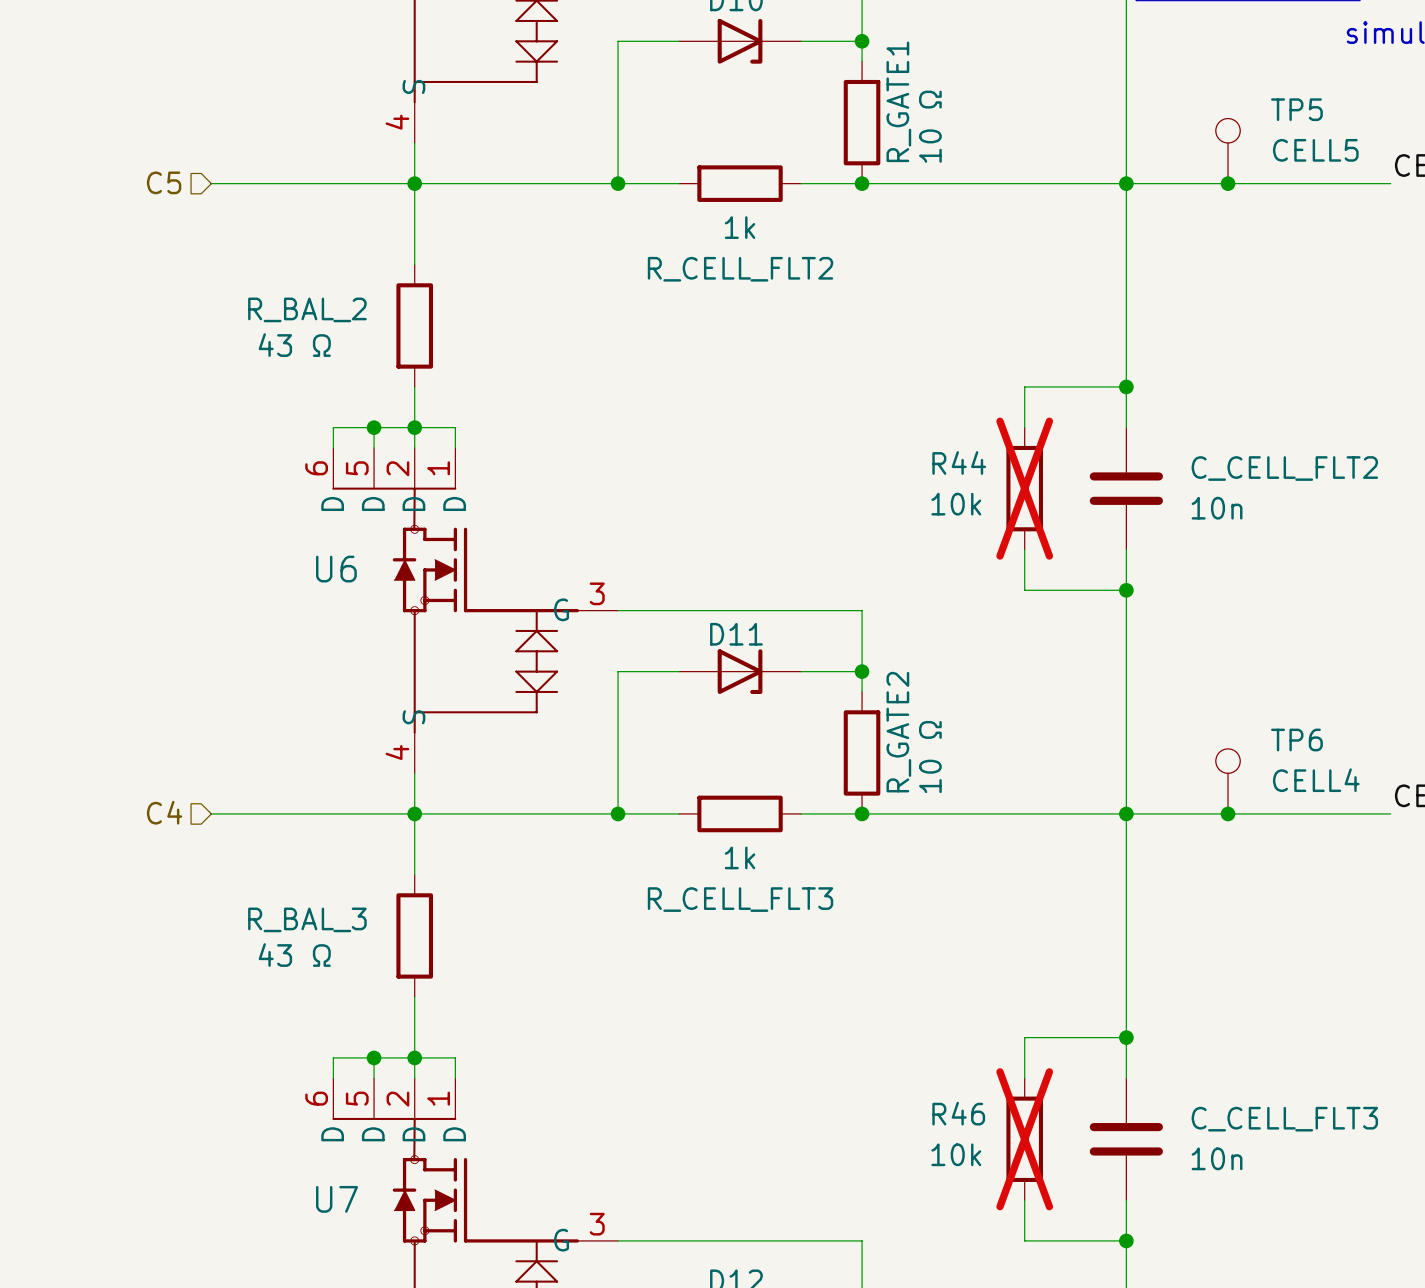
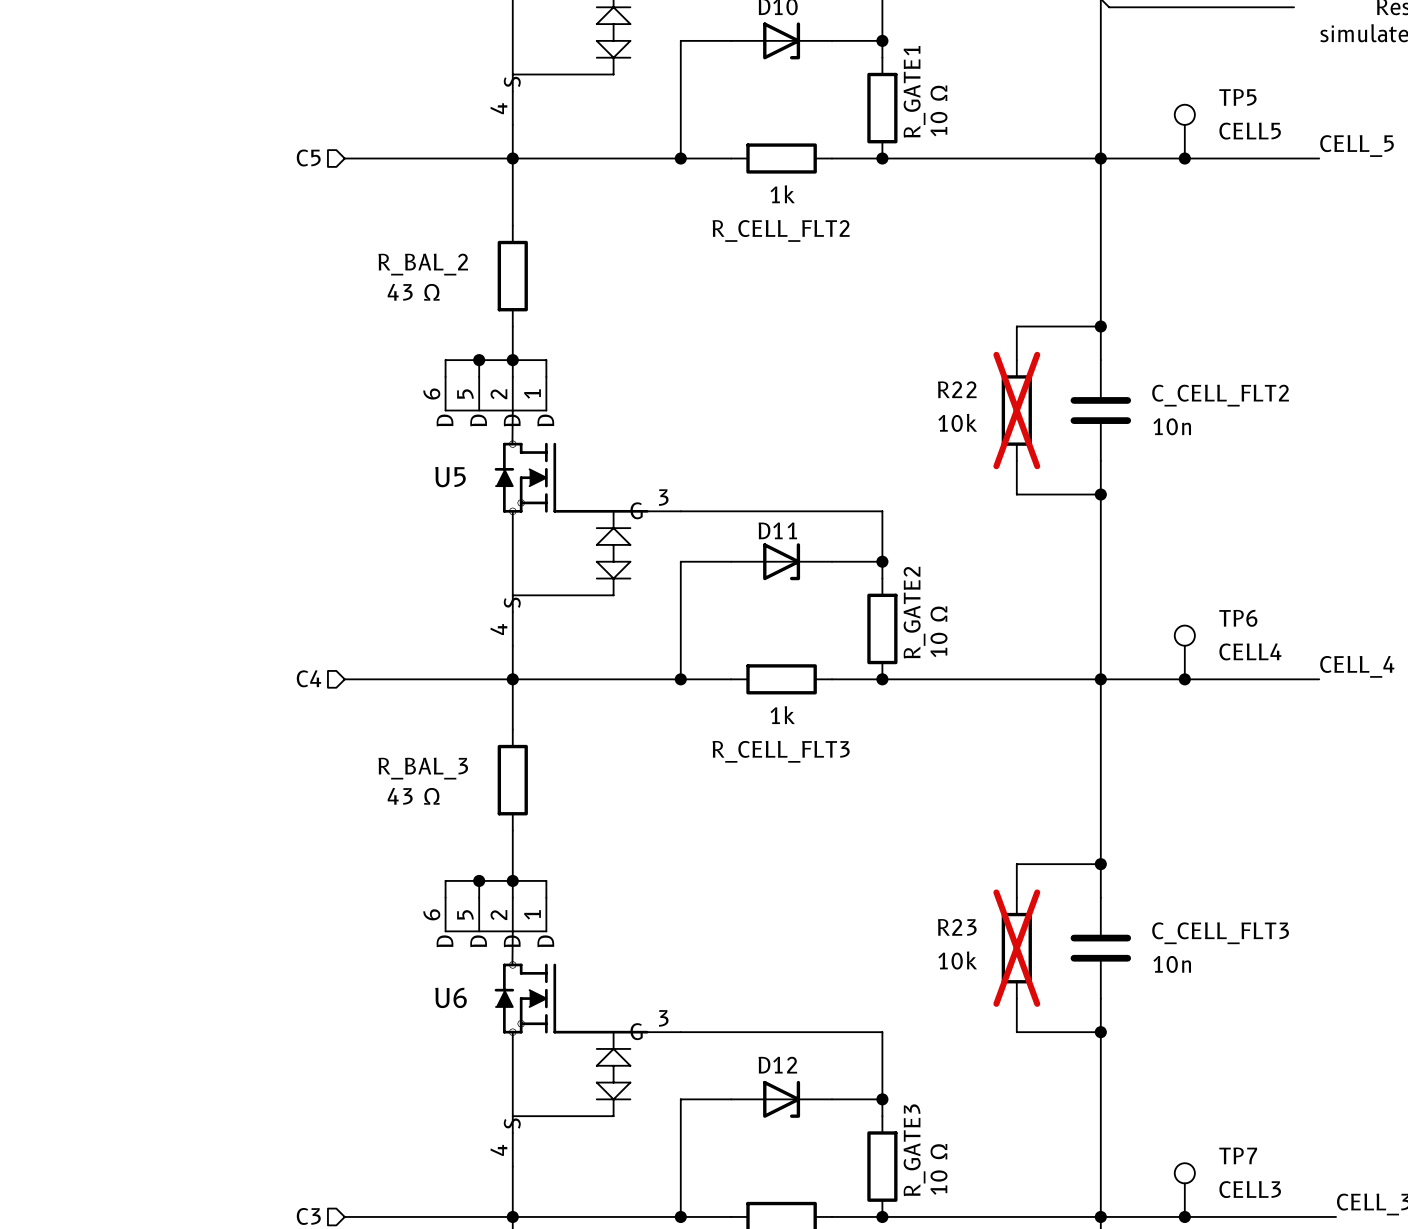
R44 name: R44 (959, 462) -> R22 (957, 389)
U6 name: U6 (336, 569) -> U5 (450, 477)
R46 name: R46 (958, 1113) -> R23 (957, 927)
U7 name: U7 (337, 1199) -> U6 (451, 997)

